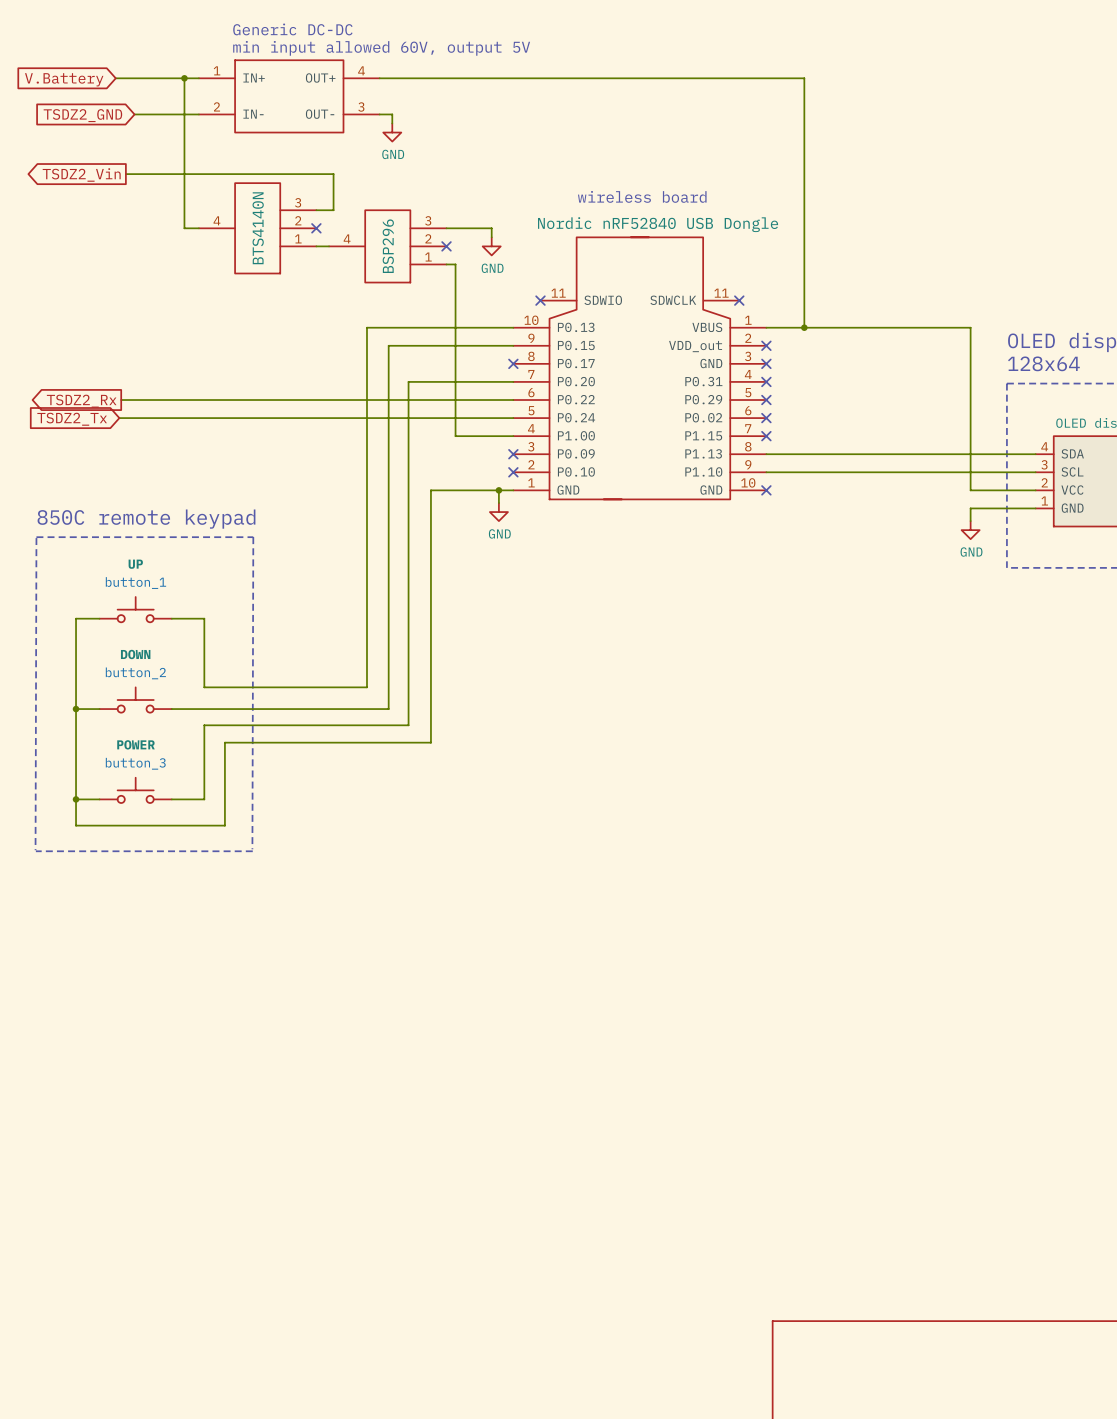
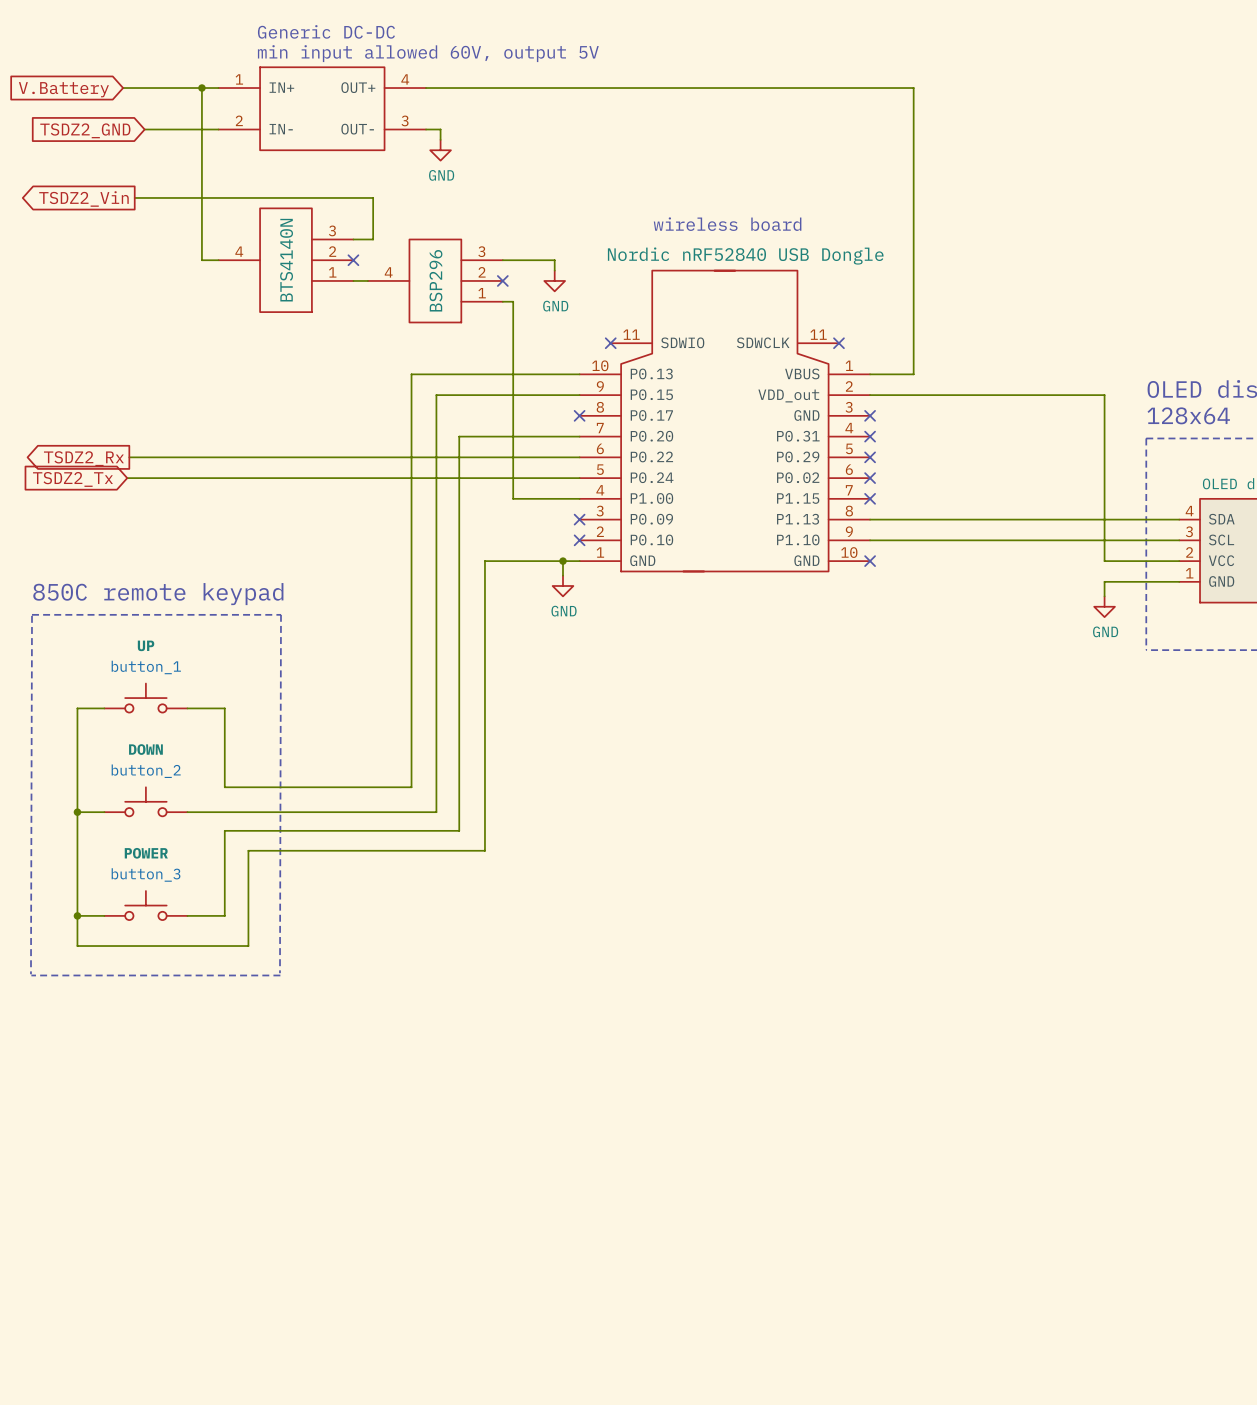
wire: (804, 327) (970, 327) (970, 345) -> (870, 395) (1104, 395)
junction: (804, 327) -> none
no-connect mark: (766, 345) -> none

